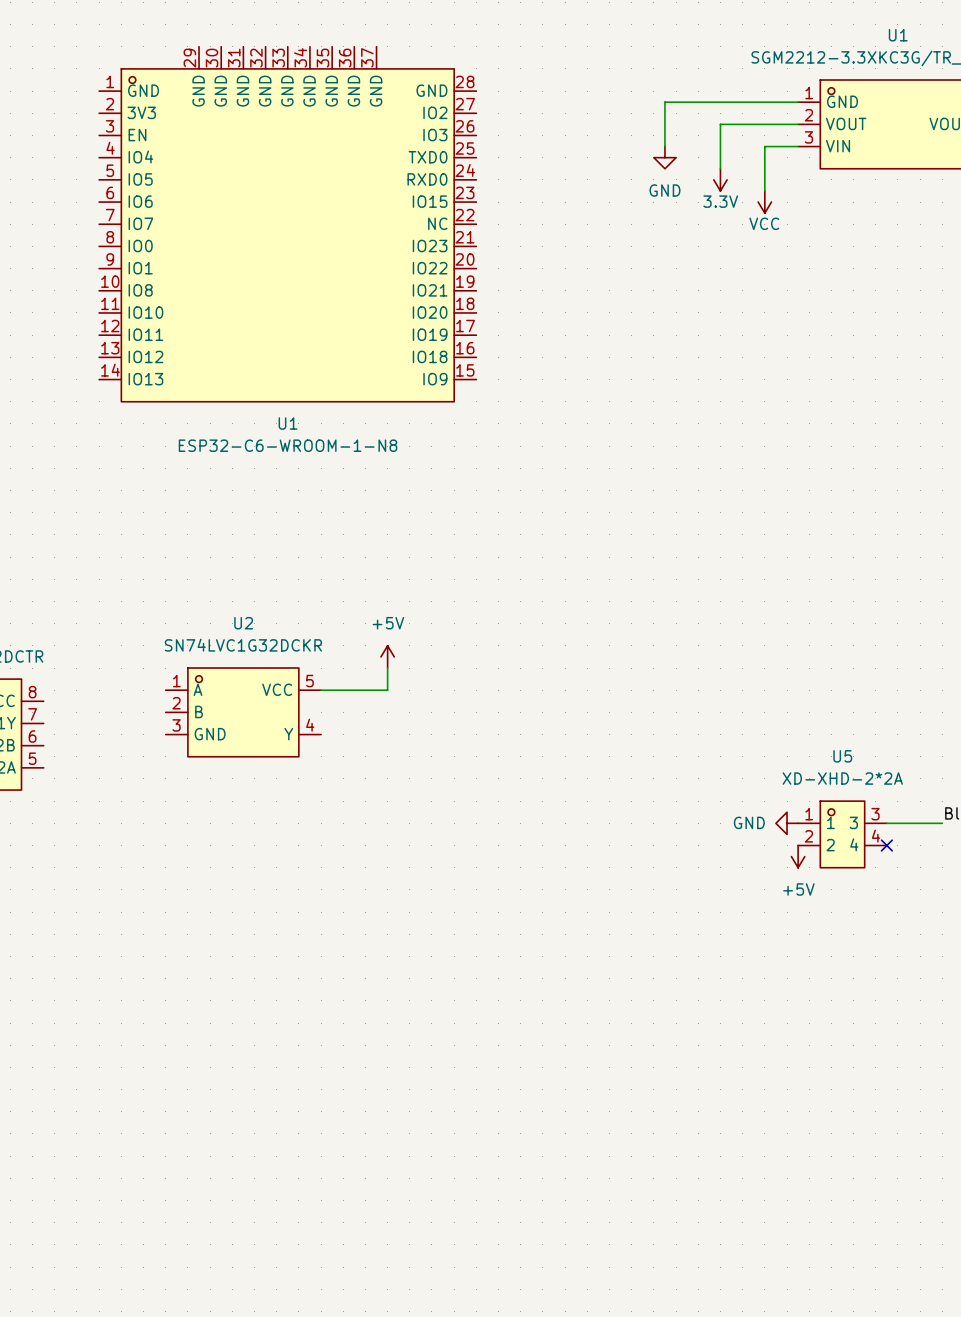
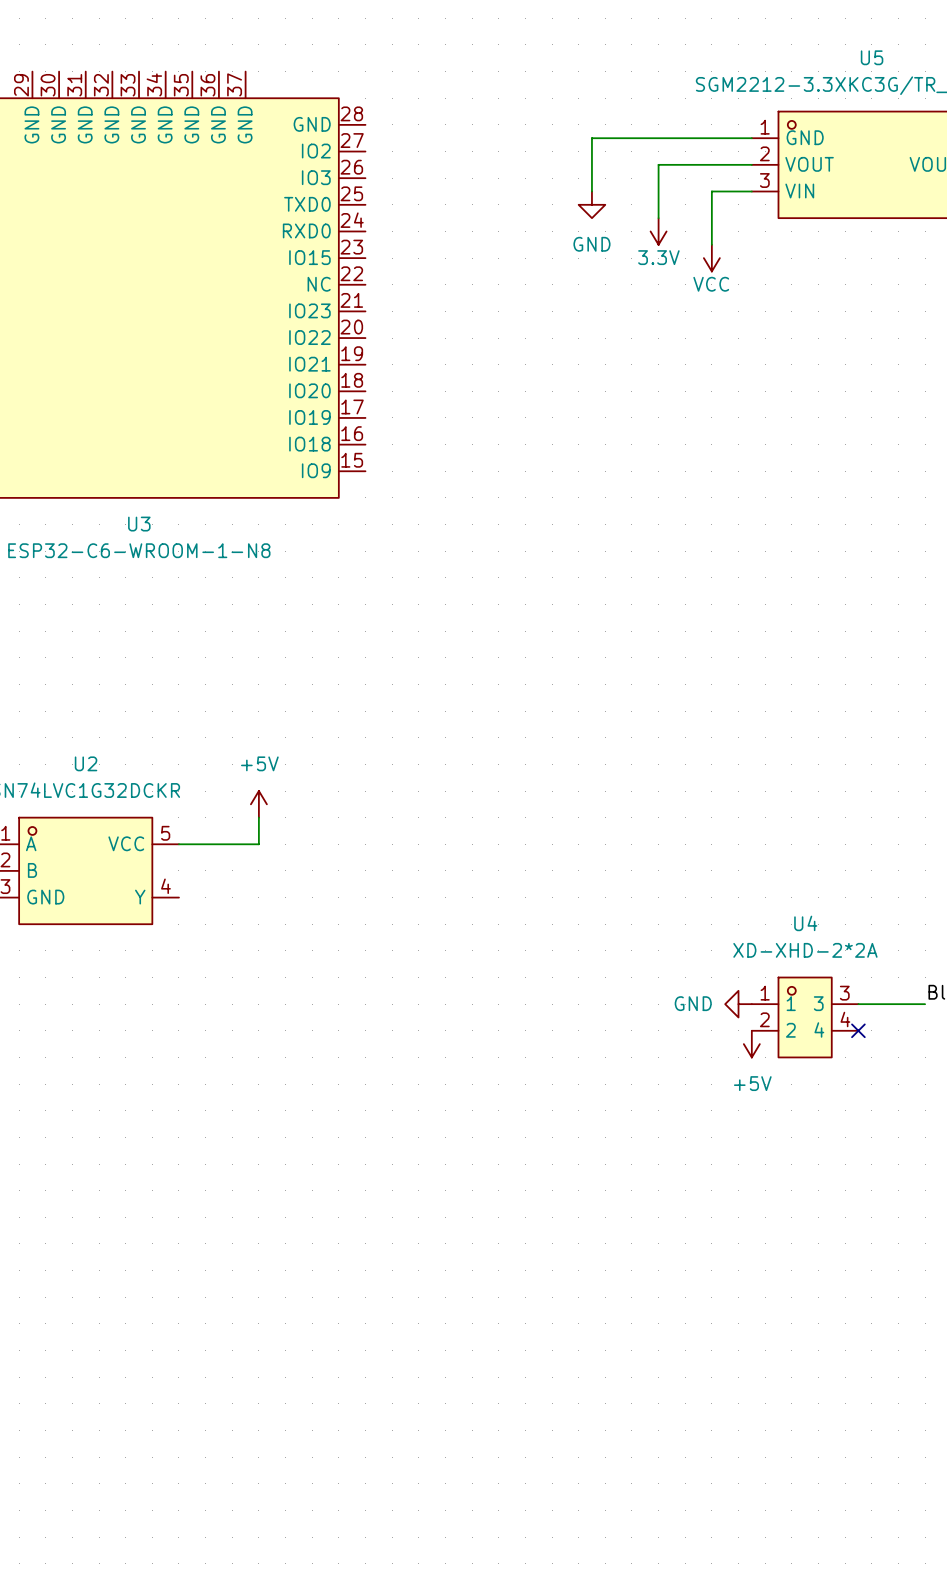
U1 name: U1 (898, 35) -> U5 (872, 57)
U1 name: U1 (288, 423) -> U3 (139, 524)
U5 name: U5 (842, 756) -> U4 (805, 923)

